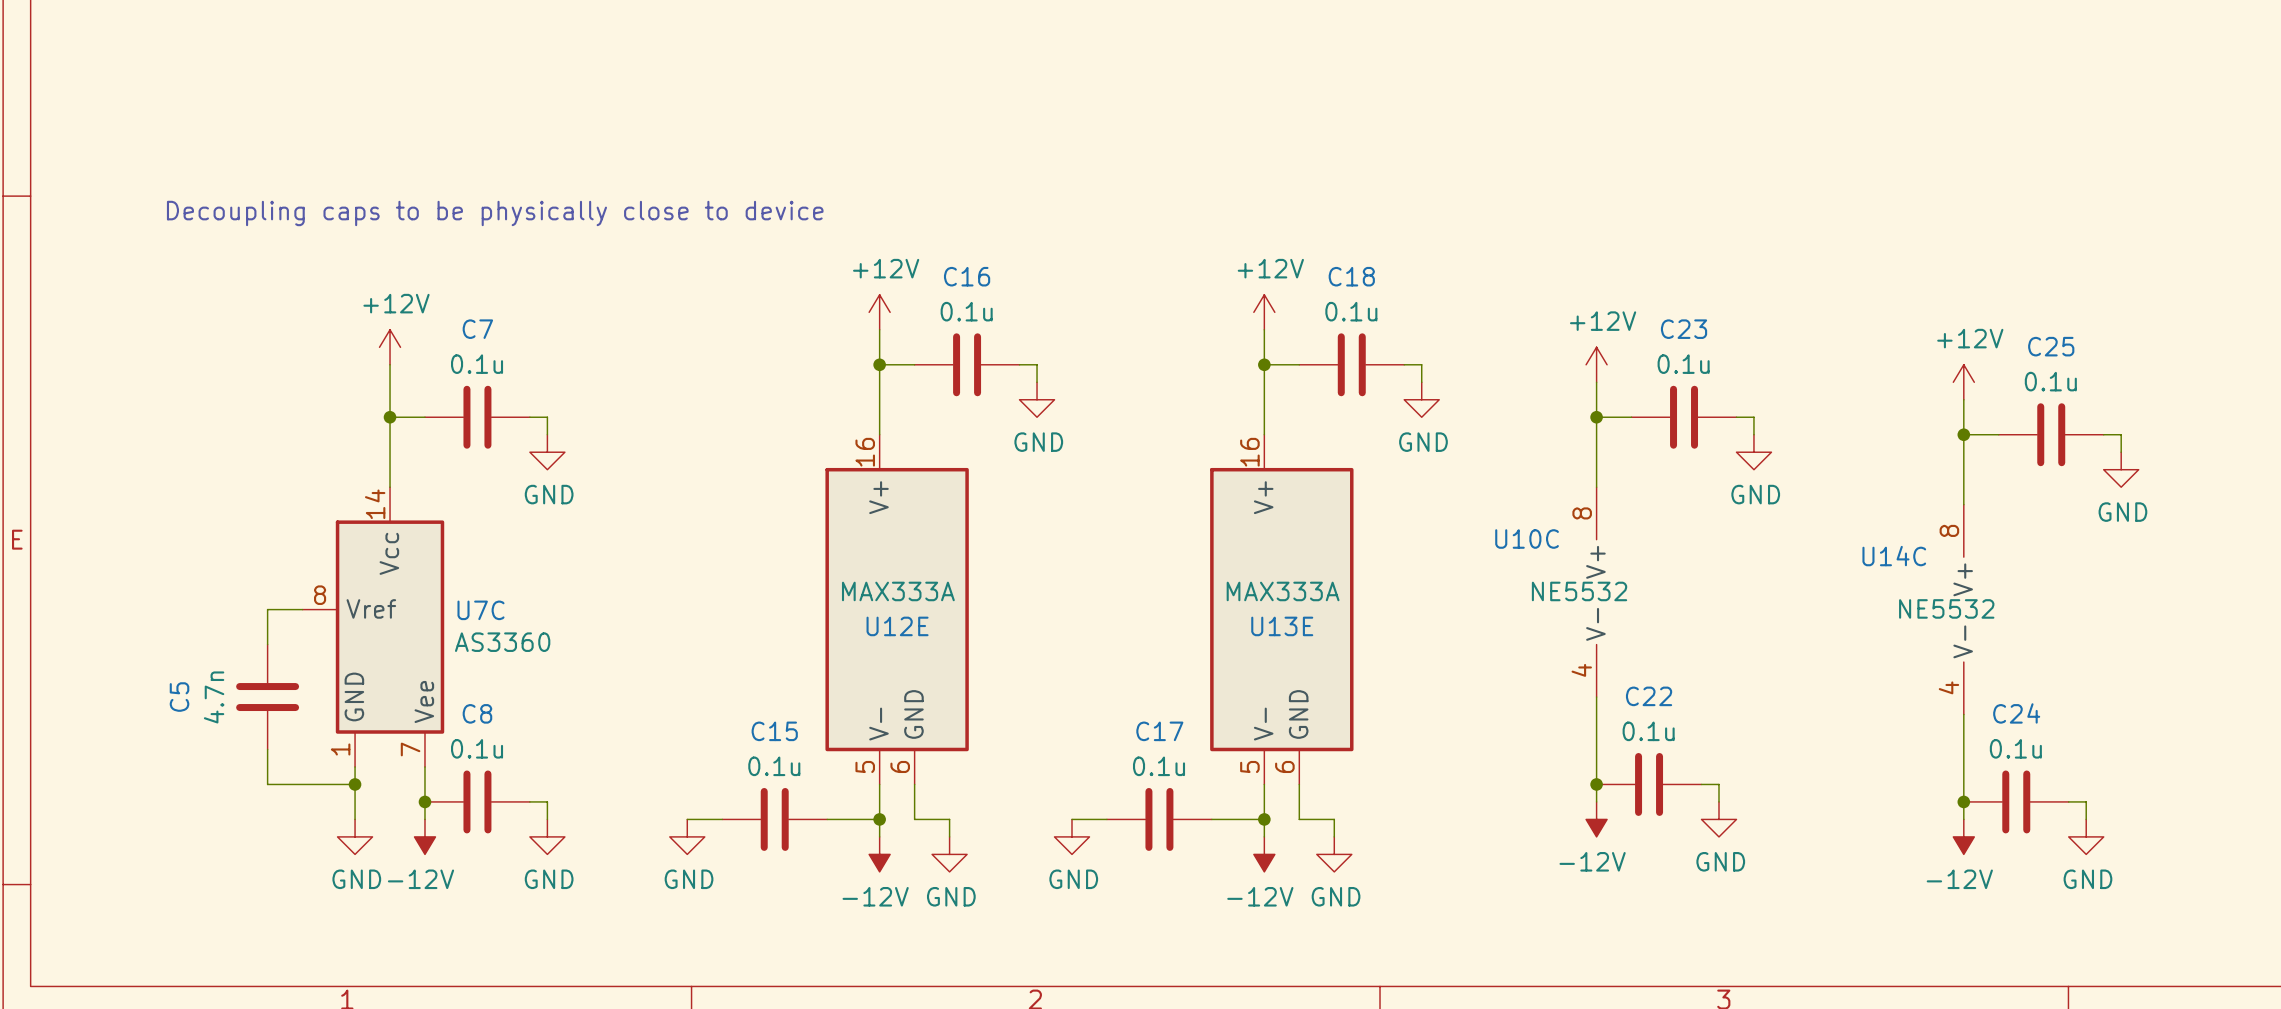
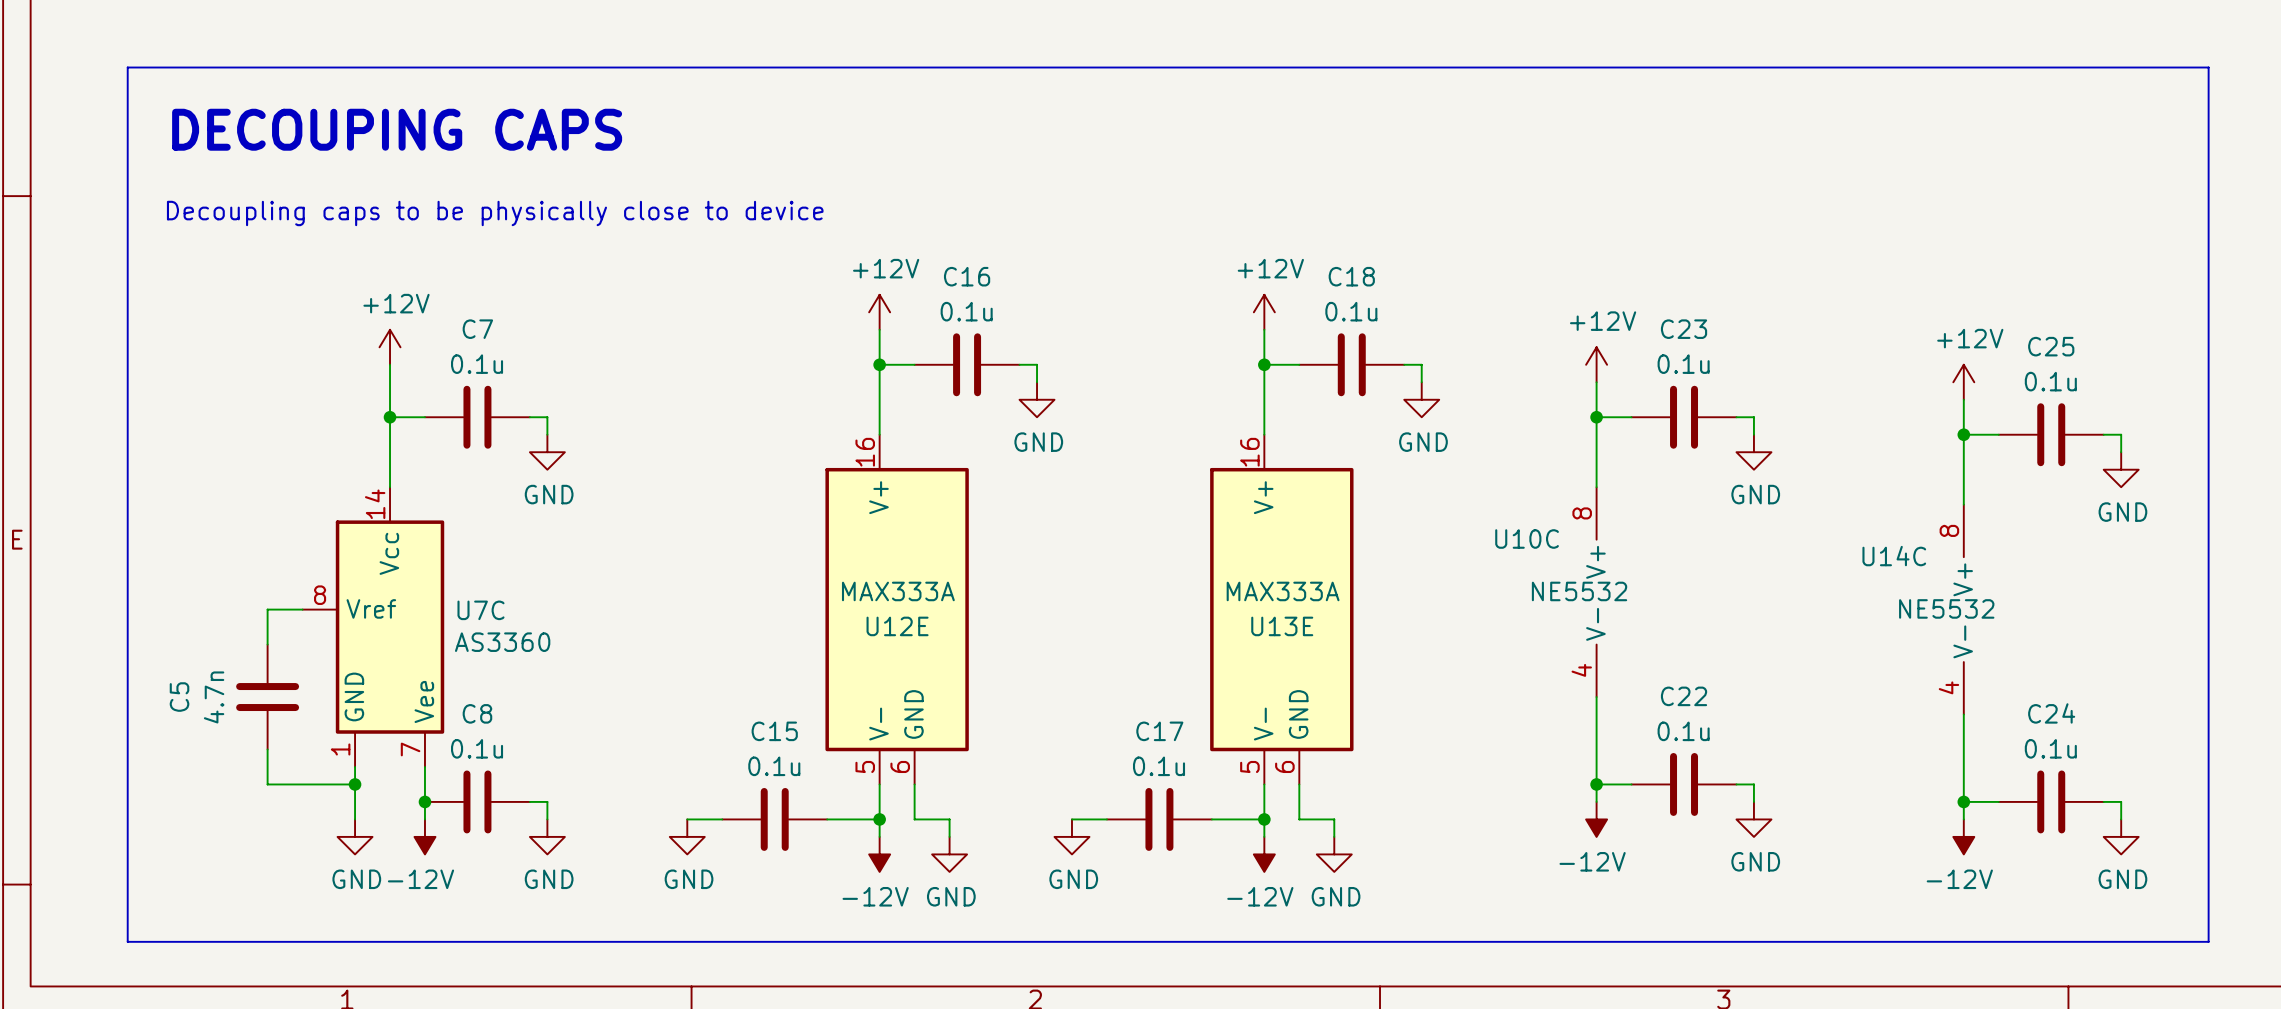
line: none -> (127, 67) (127, 941) (2208, 941) (2208, 67) (127, 67)
text: none -> DECOUPING CAPS (397, 129)
C22 position: (1649, 784) -> (1684, 784)
wire: (1701, 784) (1718, 784) (1718, 801) -> (1736, 784) (1753, 784) (1753, 801)
C24 position: (2016, 801) -> (2051, 801)
wire: (2068, 801) (2086, 801) (2086, 819) -> (2103, 801) (2121, 801) (2121, 819)
power symbol position: GND (1718, 819) -> GND (1753, 819)
power symbol position: GND (2086, 836) -> GND (2121, 836)

